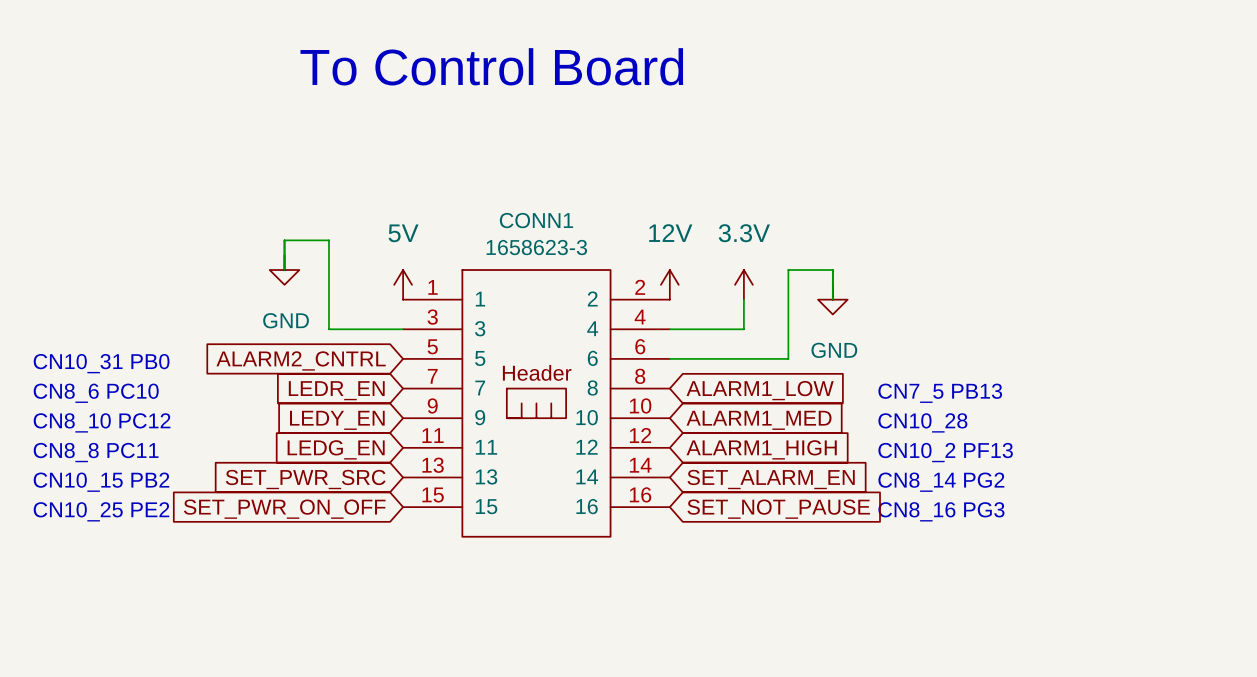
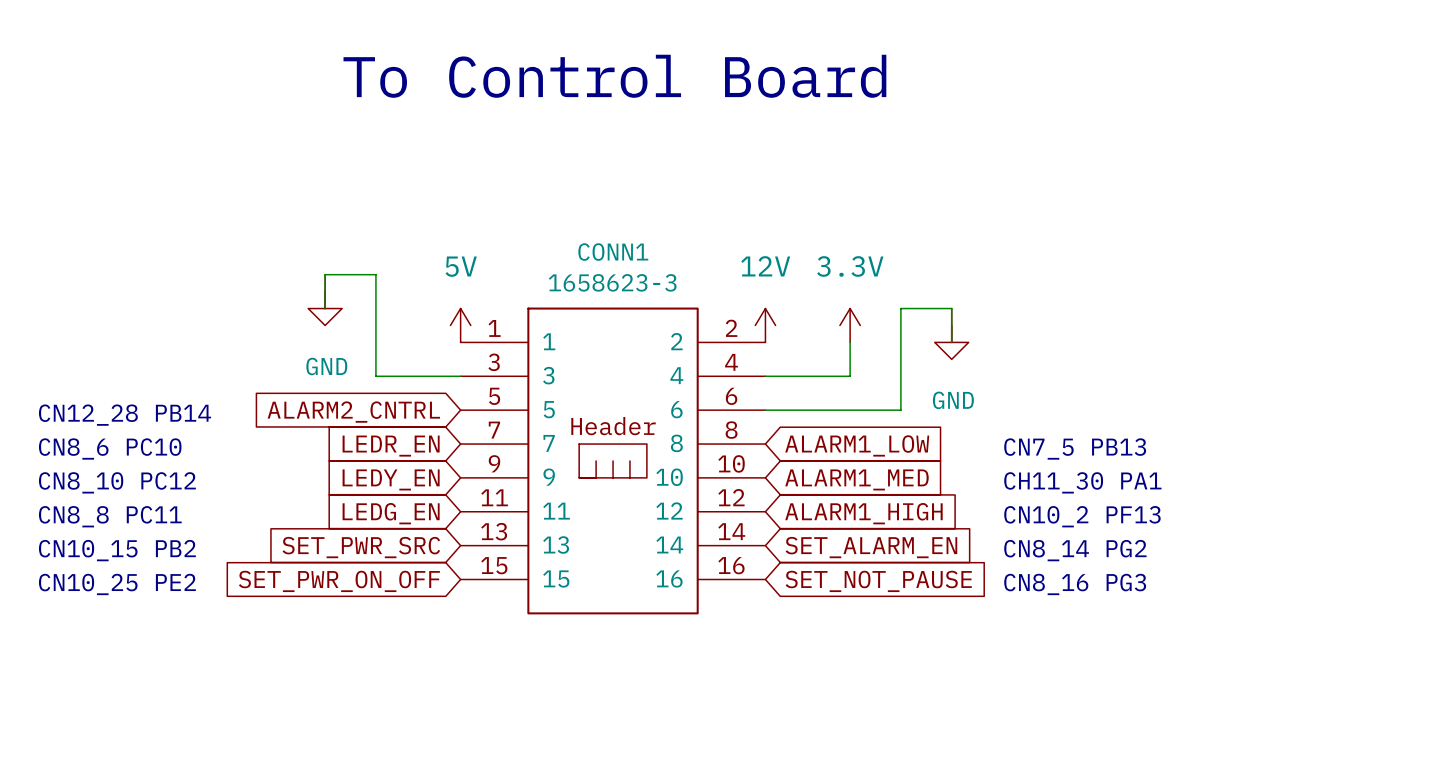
text: CN10_31 PB0 (101, 363) -> CN12_28 PB14 (124, 415)
text: CN10_28 (922, 422) -> CH11_30 PA1 (1082, 482)

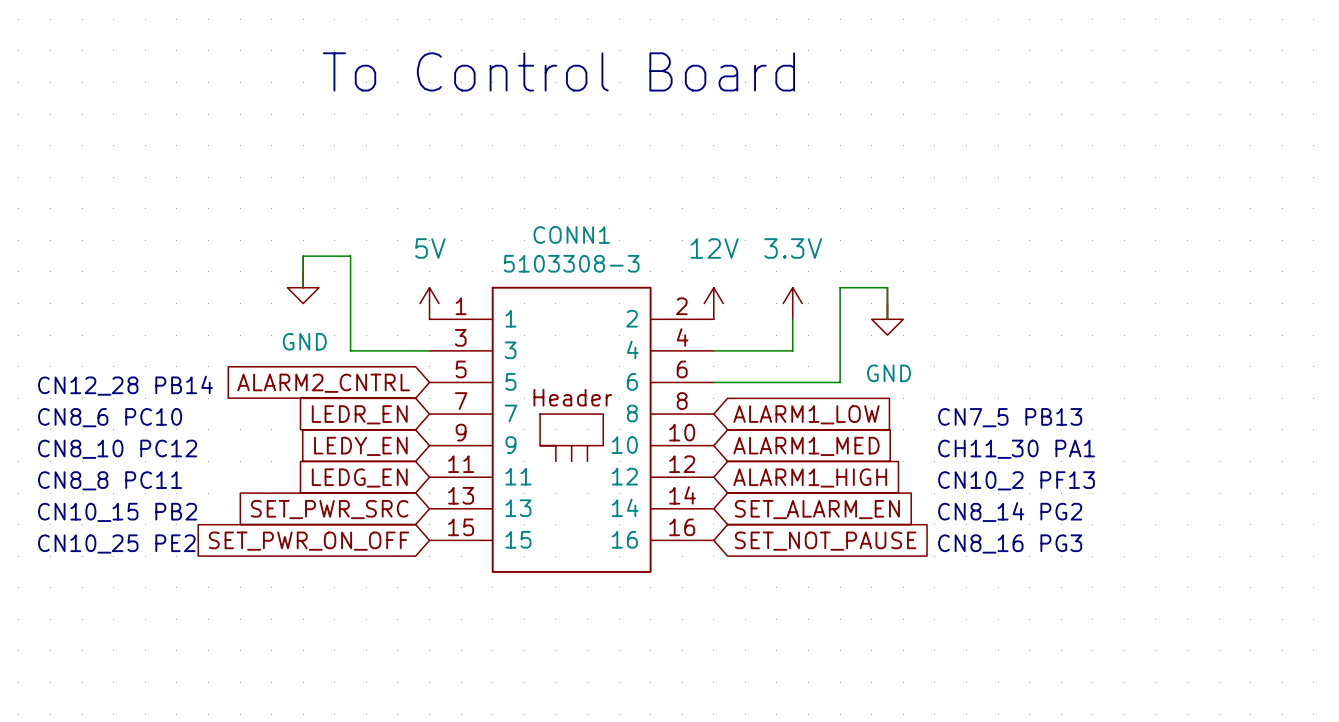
CONN1 value: 1658623-3 (612, 282) -> 5103308-3 (571, 263)
CONN1 symbol: [460, 307, 766, 615] -> [429, 286, 714, 573]

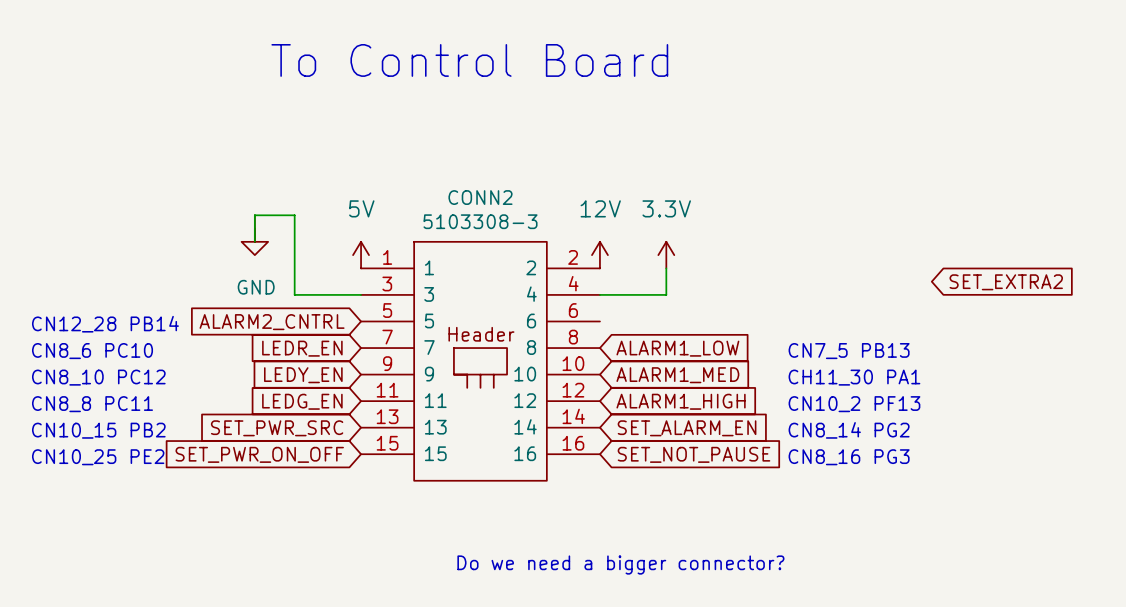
CONN1 name: CONN1 (571, 235) -> CONN2 (480, 197)
power symbol: GND (887, 311) -> none
wire: (887, 319) (887, 287) (840, 287) (840, 382) (713, 382) -> none
global label: none -> SET_EXTRA2 (1006, 282)
text: none -> Do we need a bigger connector? (620, 565)

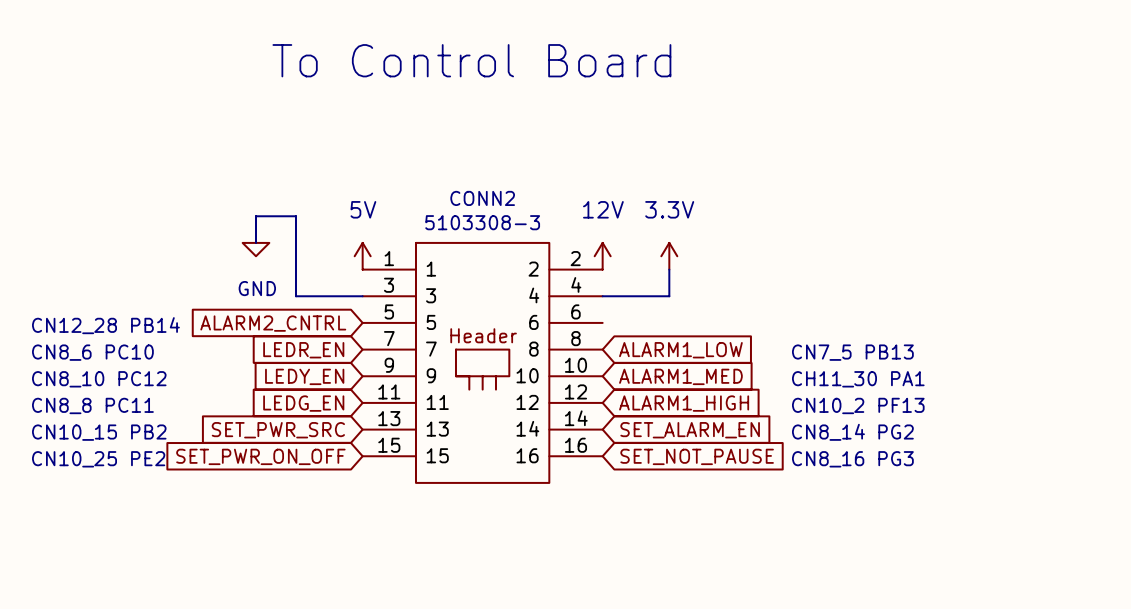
global label: SET_EXTRA2 (1006, 282) -> none
text: Do we need a bigger connector? (620, 565) -> none

